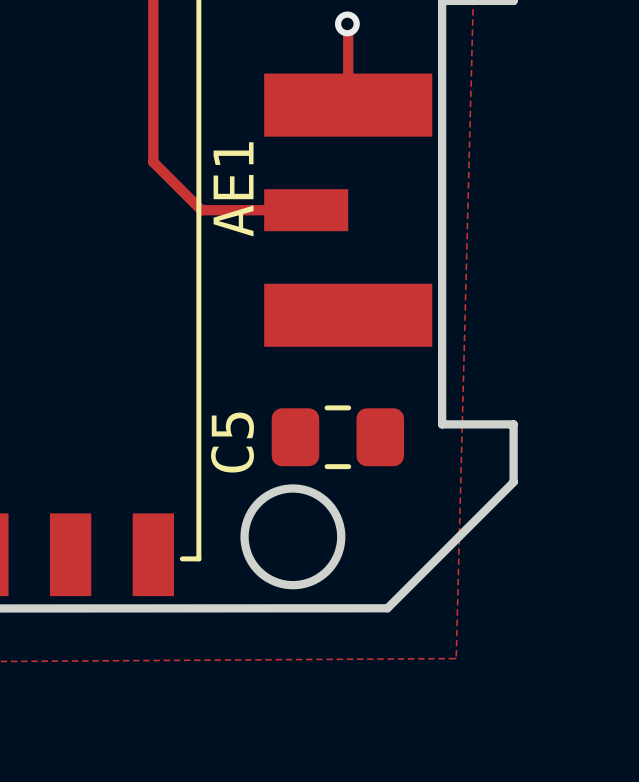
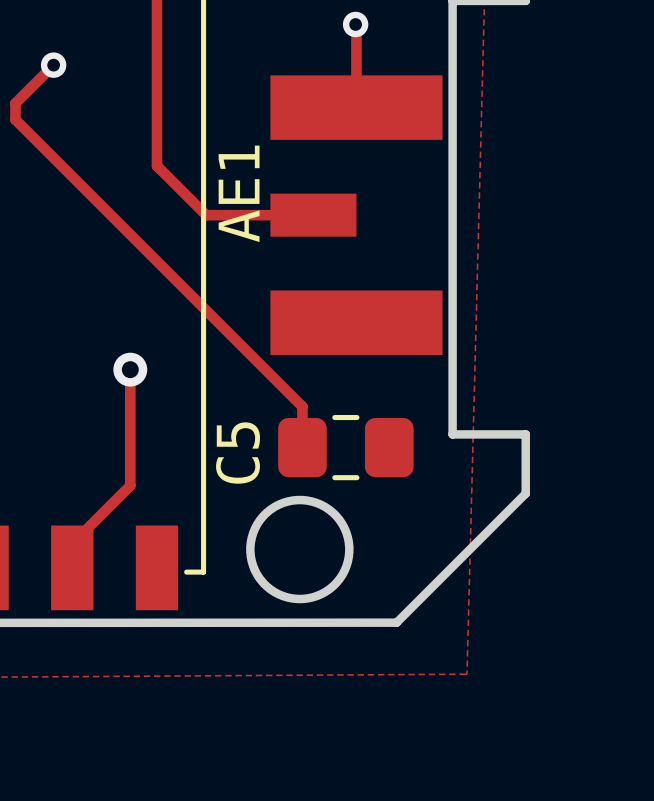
track: none -> (53, 65) (15, 103) (15, 119) (302, 406) (302, 447)
via: none -> (53, 65)
track: none -> (130, 369) (130, 485) (72, 543) (72, 567)
via: none -> (130, 369)

